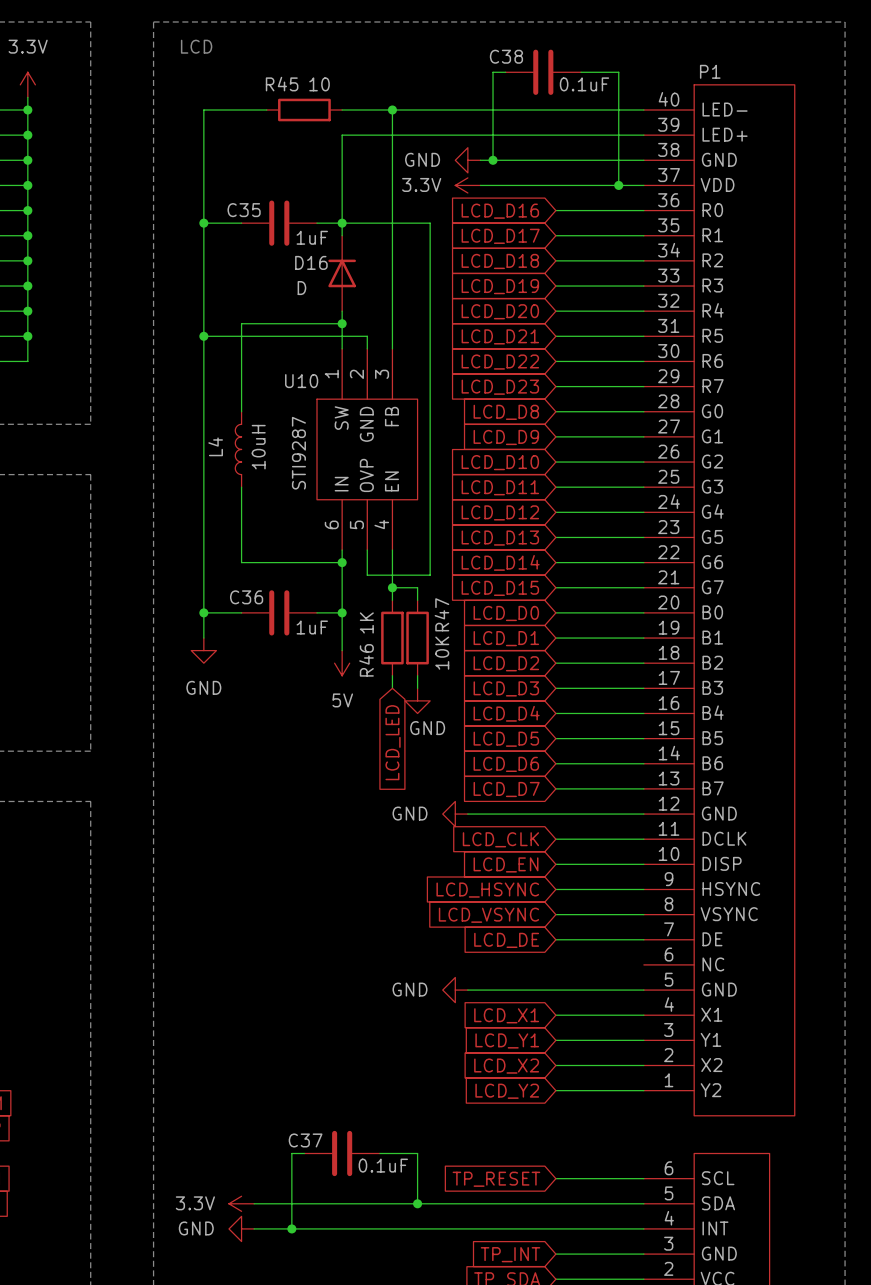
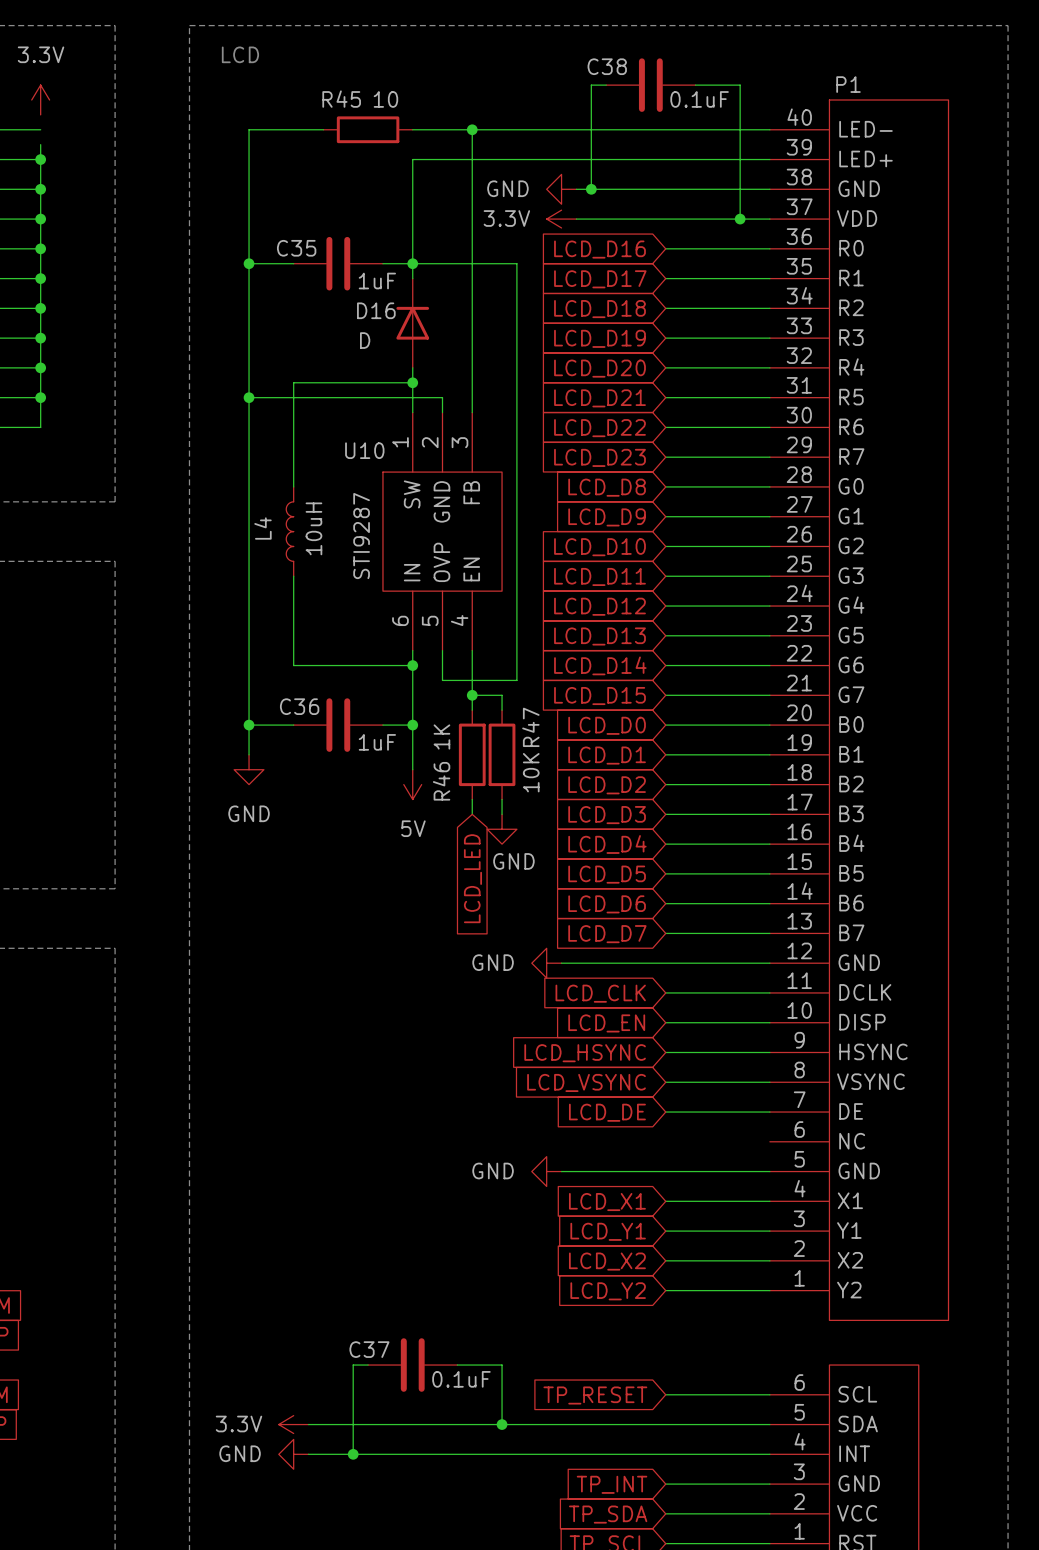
wire: (27, 97) (27, 122) -> none
junction: (27, 110) -> none

